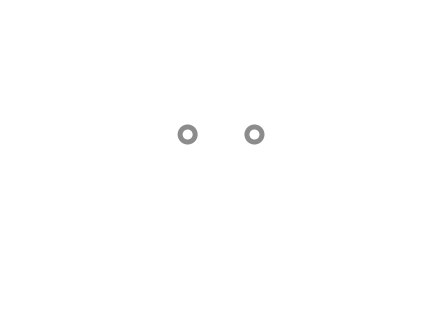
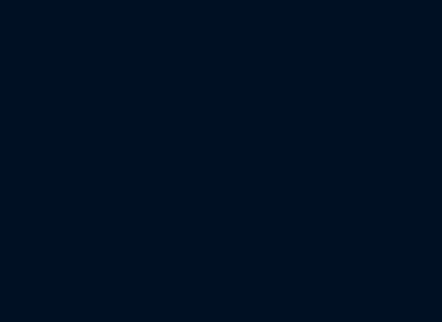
via: (187, 134) -> none
via: (254, 134) -> none

